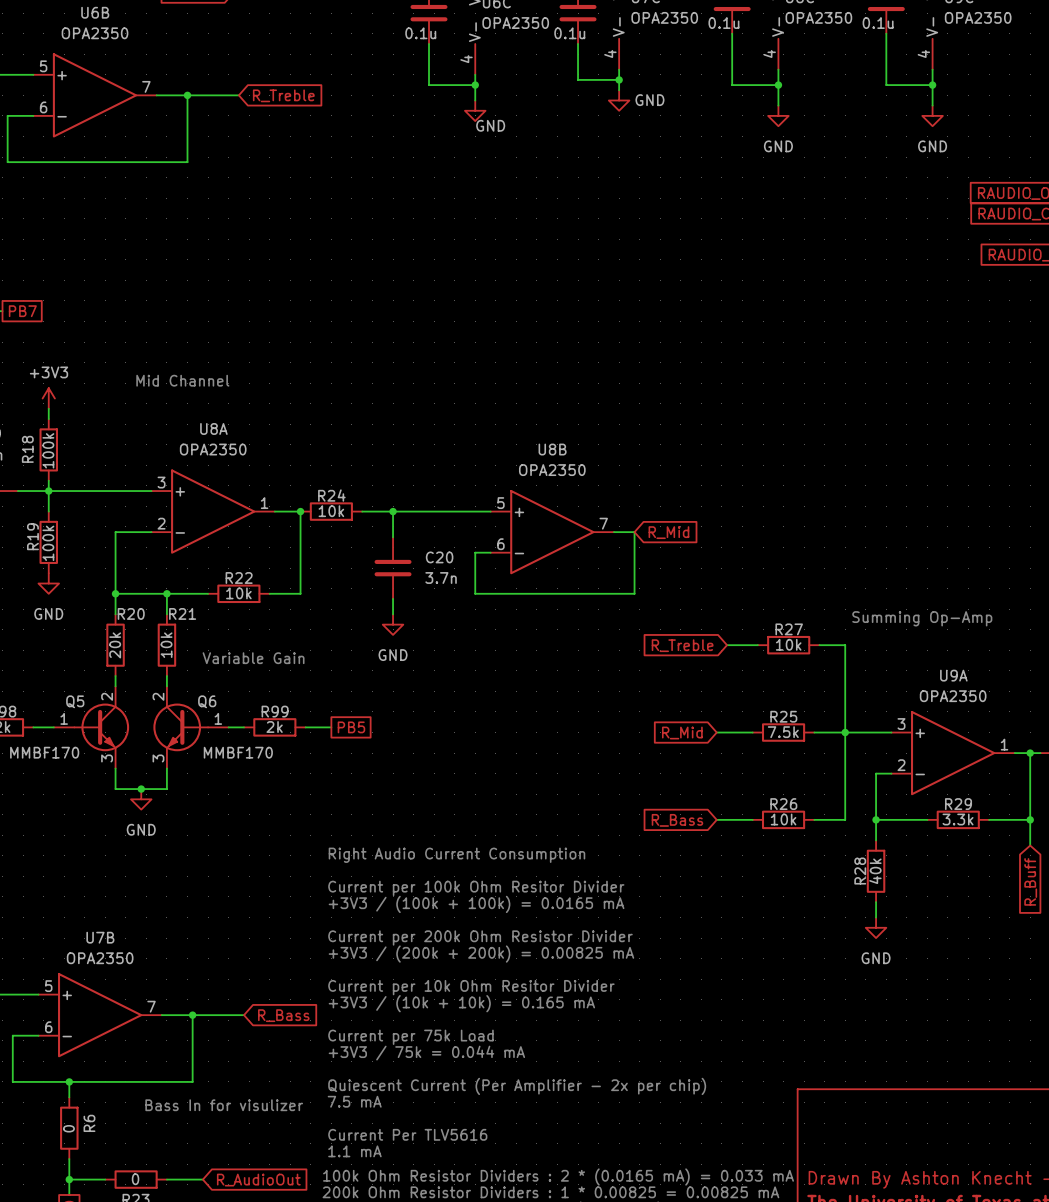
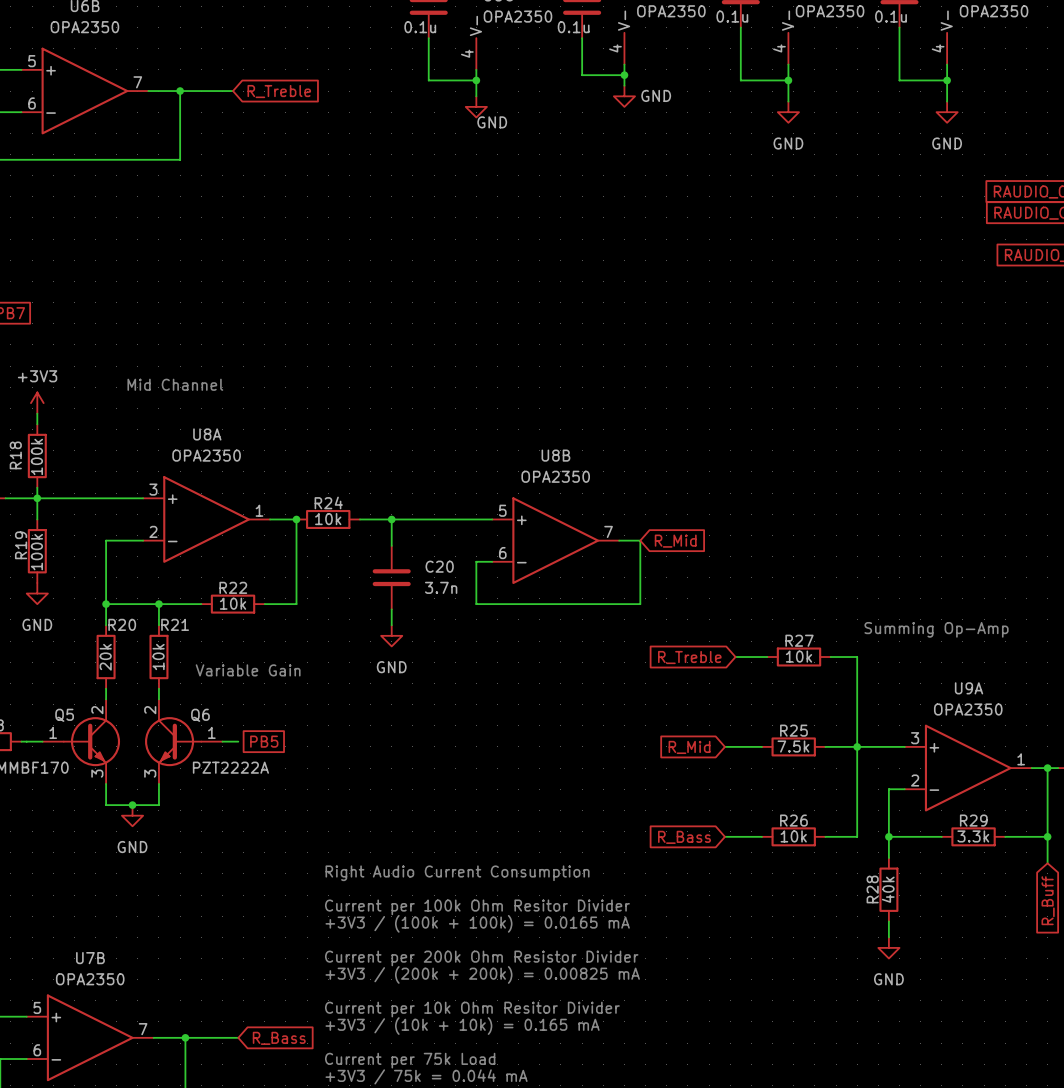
R99: 2k (274, 727) -> none
wire: (305, 727) (331, 727) -> none
global label position: PB5 (351, 727) -> PB5 (264, 741)
Q6 value: MMBF170 (238, 752) -> PZT2222A (230, 767)

